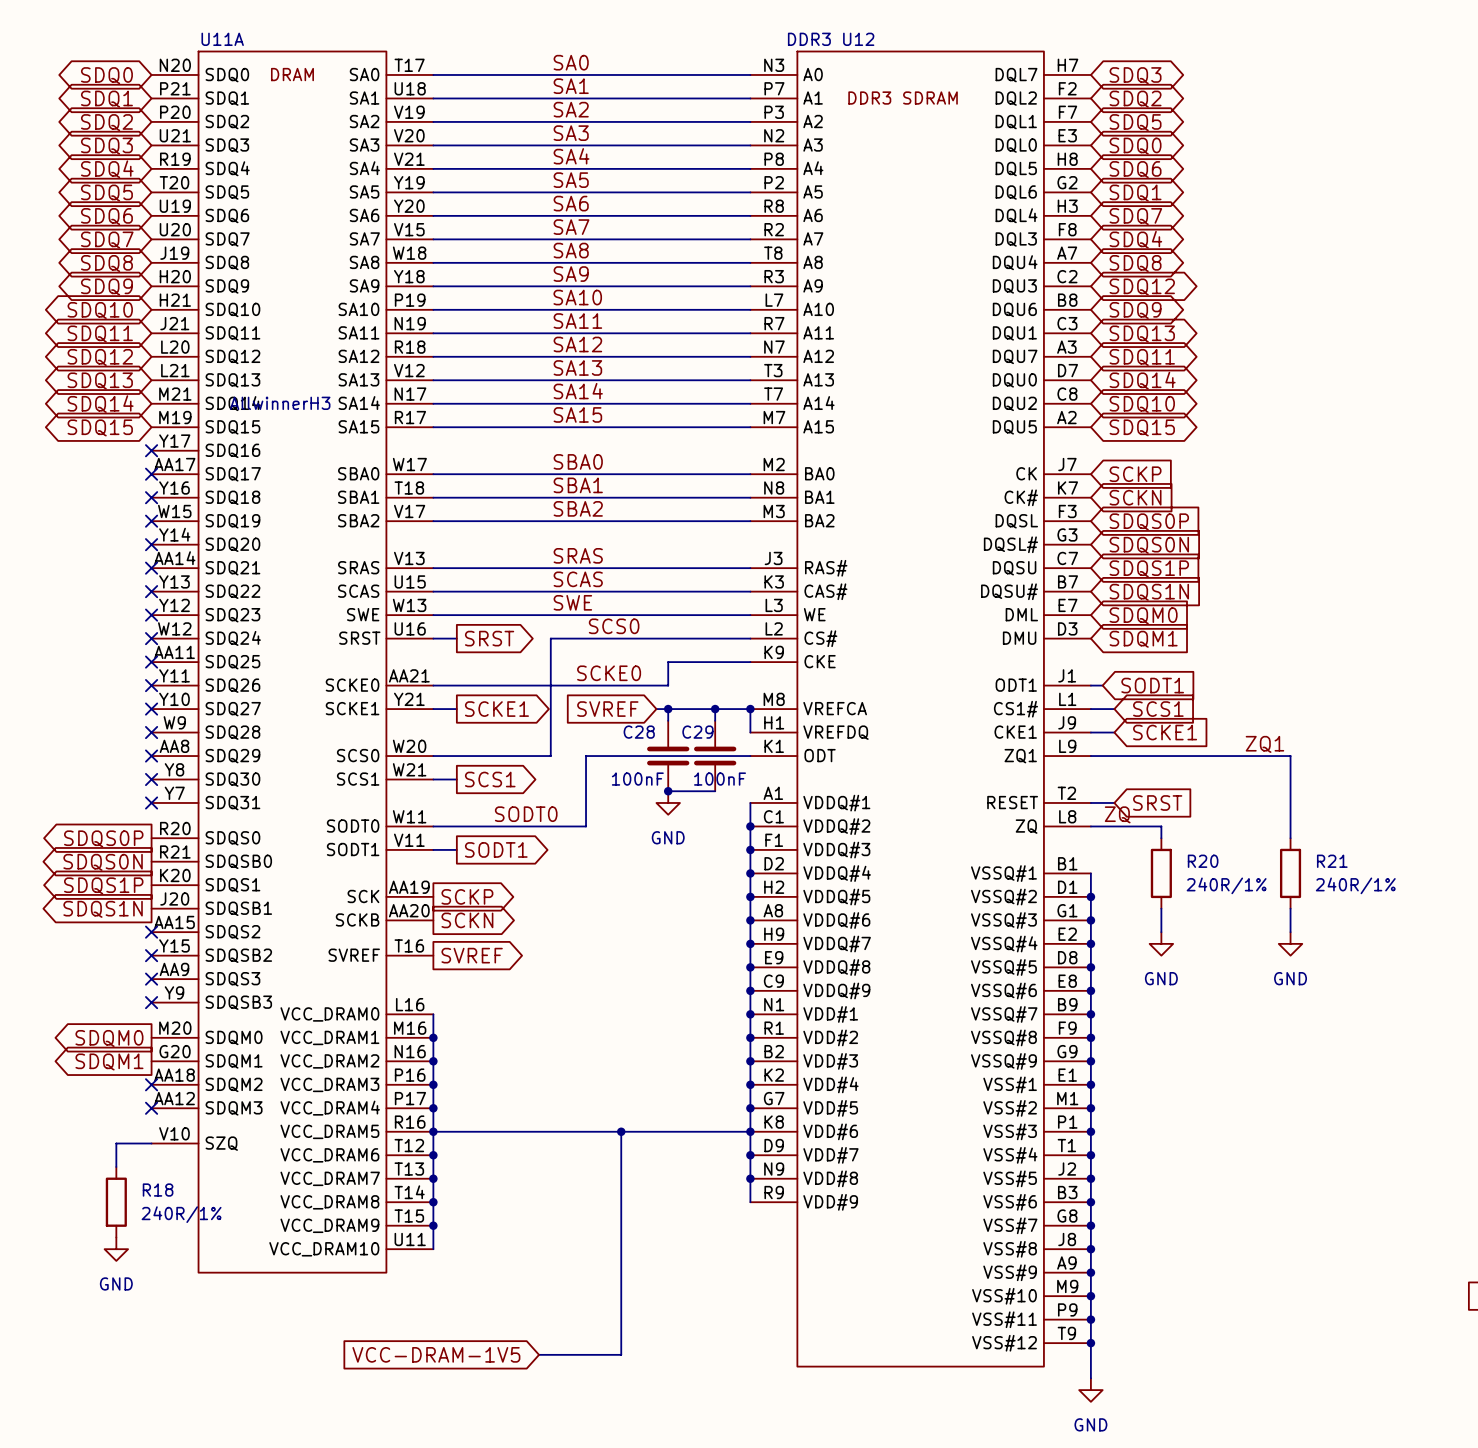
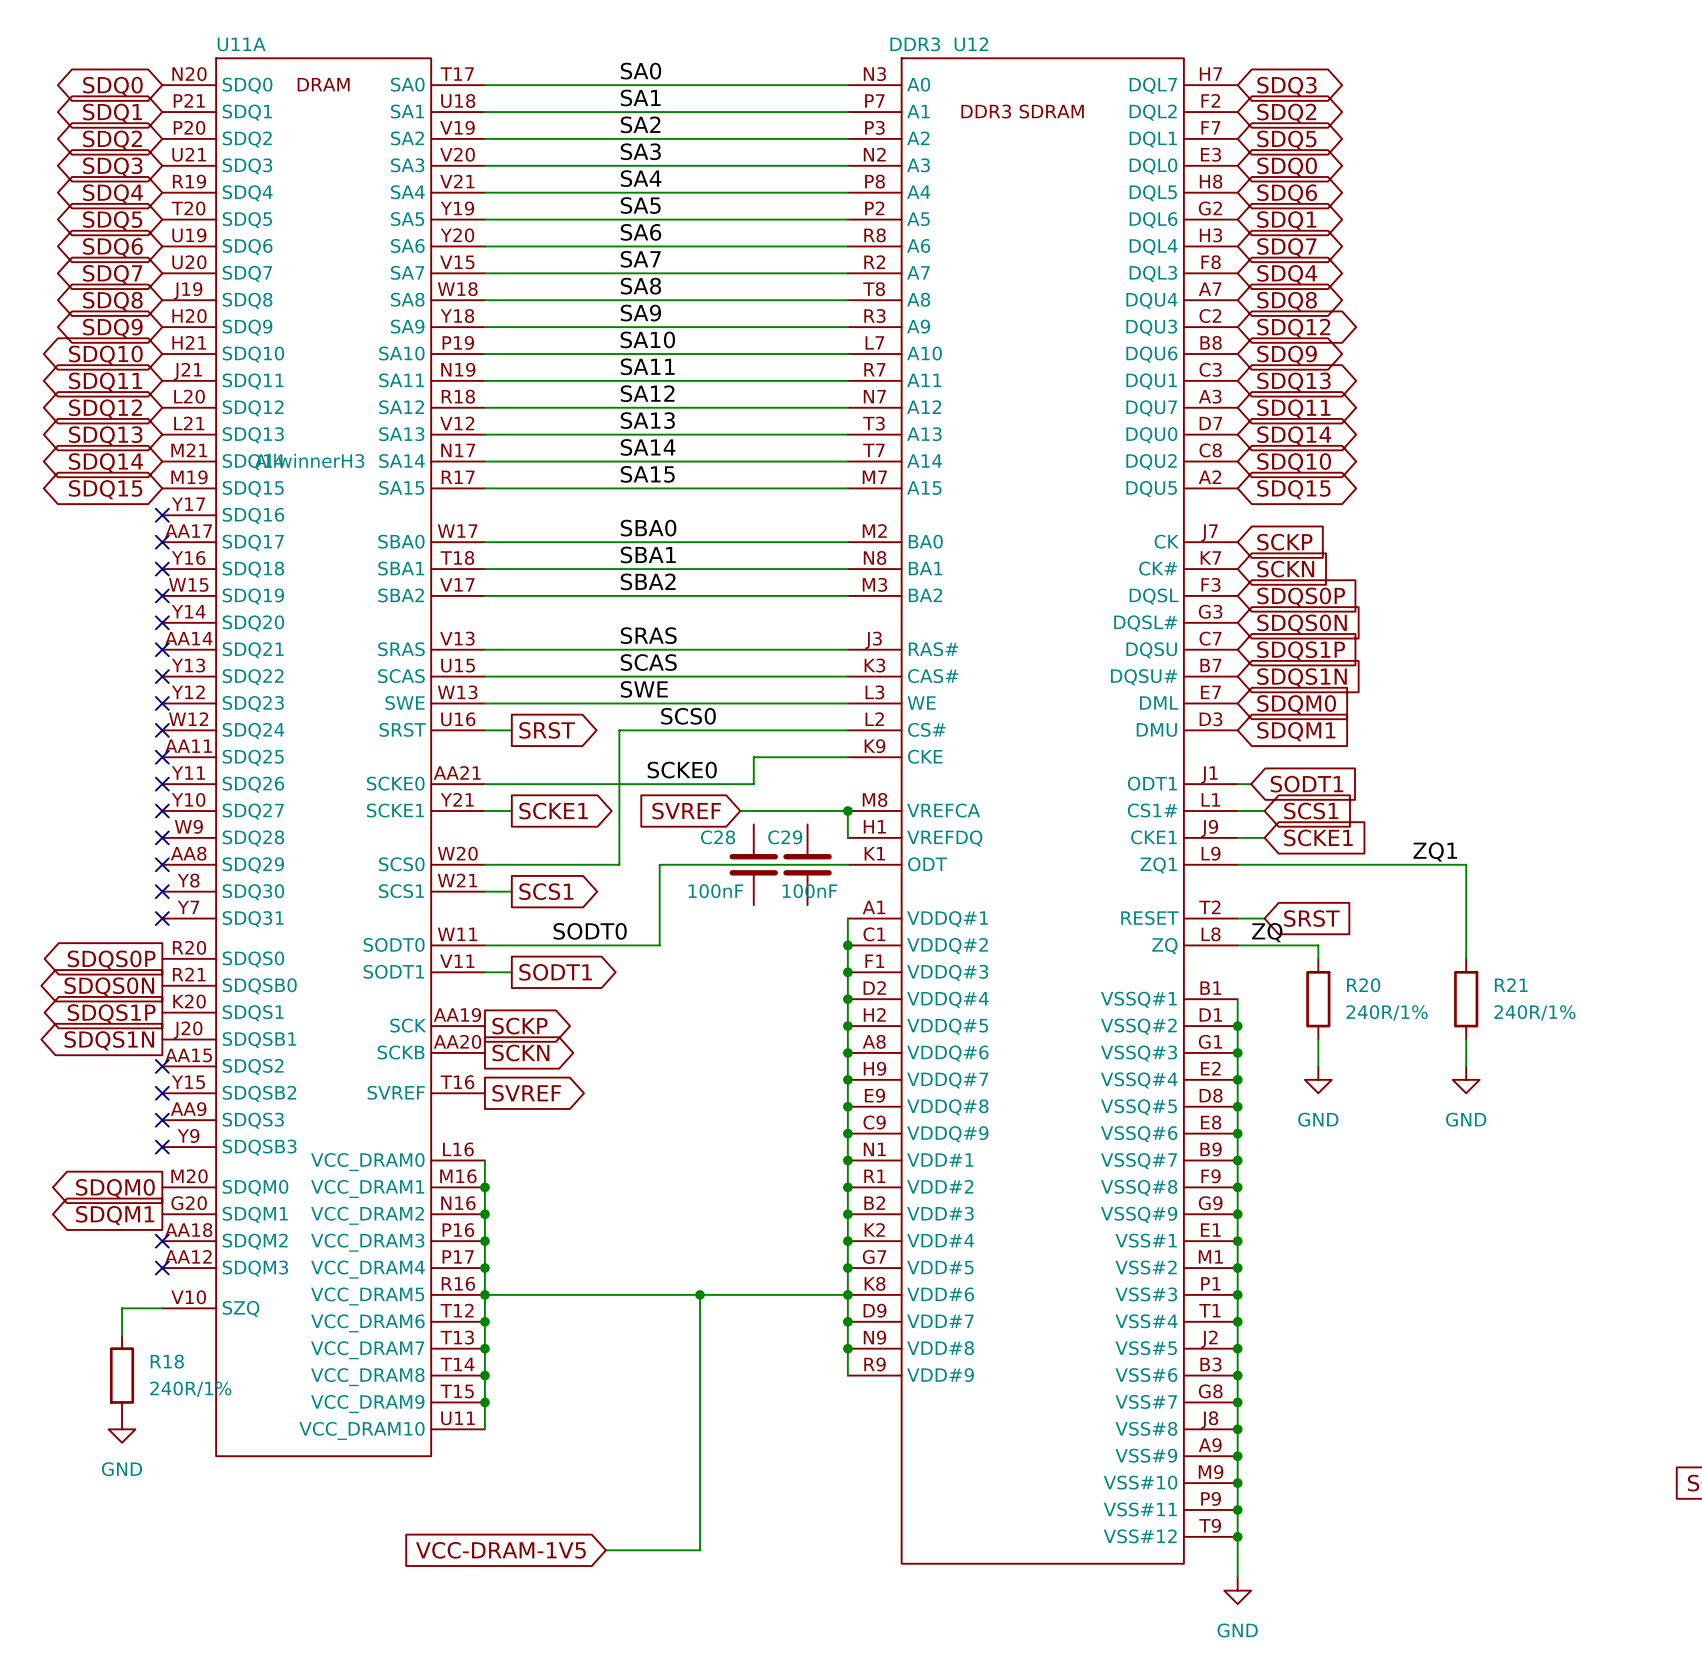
wire: (668, 709) (668, 720) -> none
junction: (668, 709) -> none
wire: (715, 709) (715, 720) -> none
junction: (715, 709) -> none
wire: (668, 791) (715, 791) -> none
junction: (668, 791) -> none
power symbol: GND (668, 802) -> none

